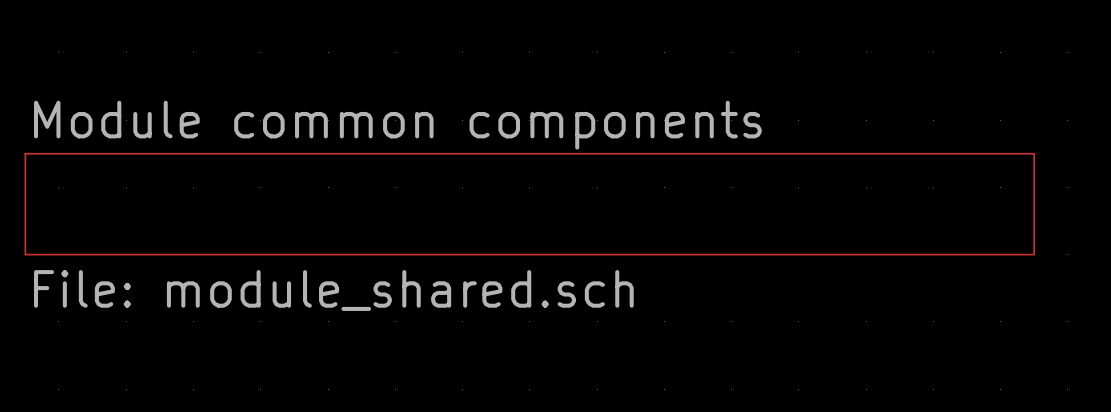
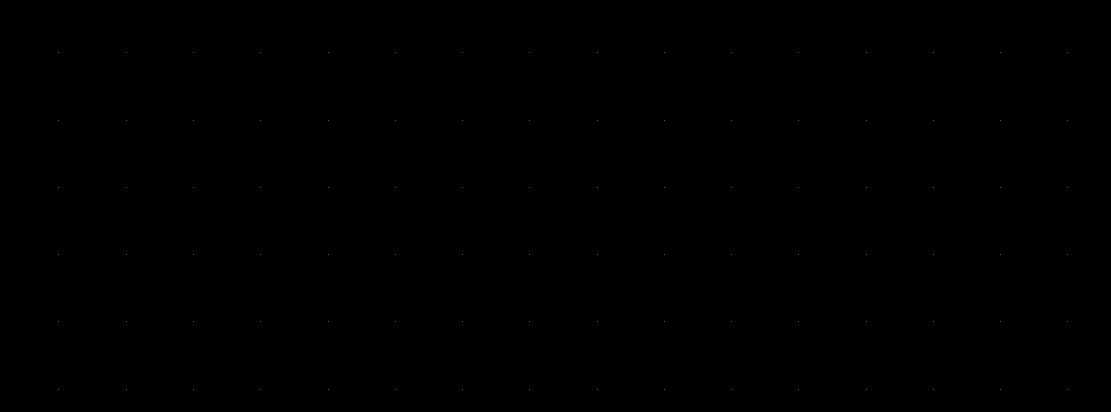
sheet Module common components: File: module_shared.sch (529, 204) -> none

